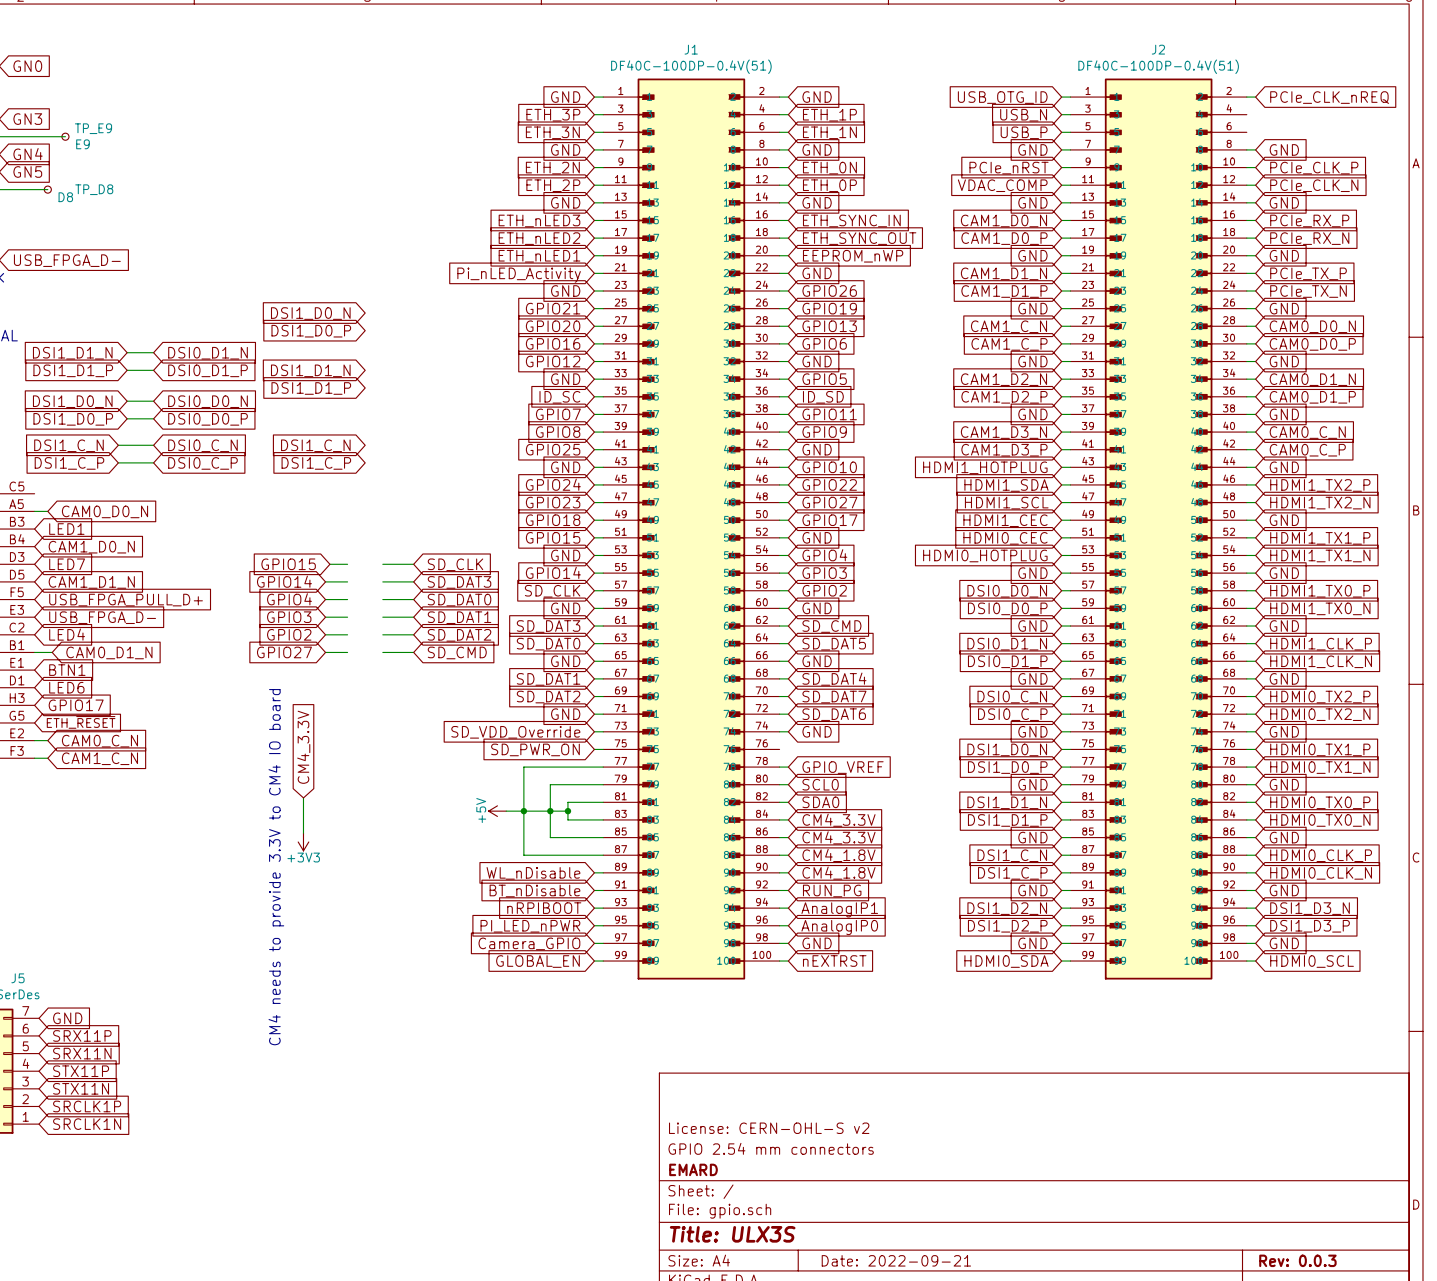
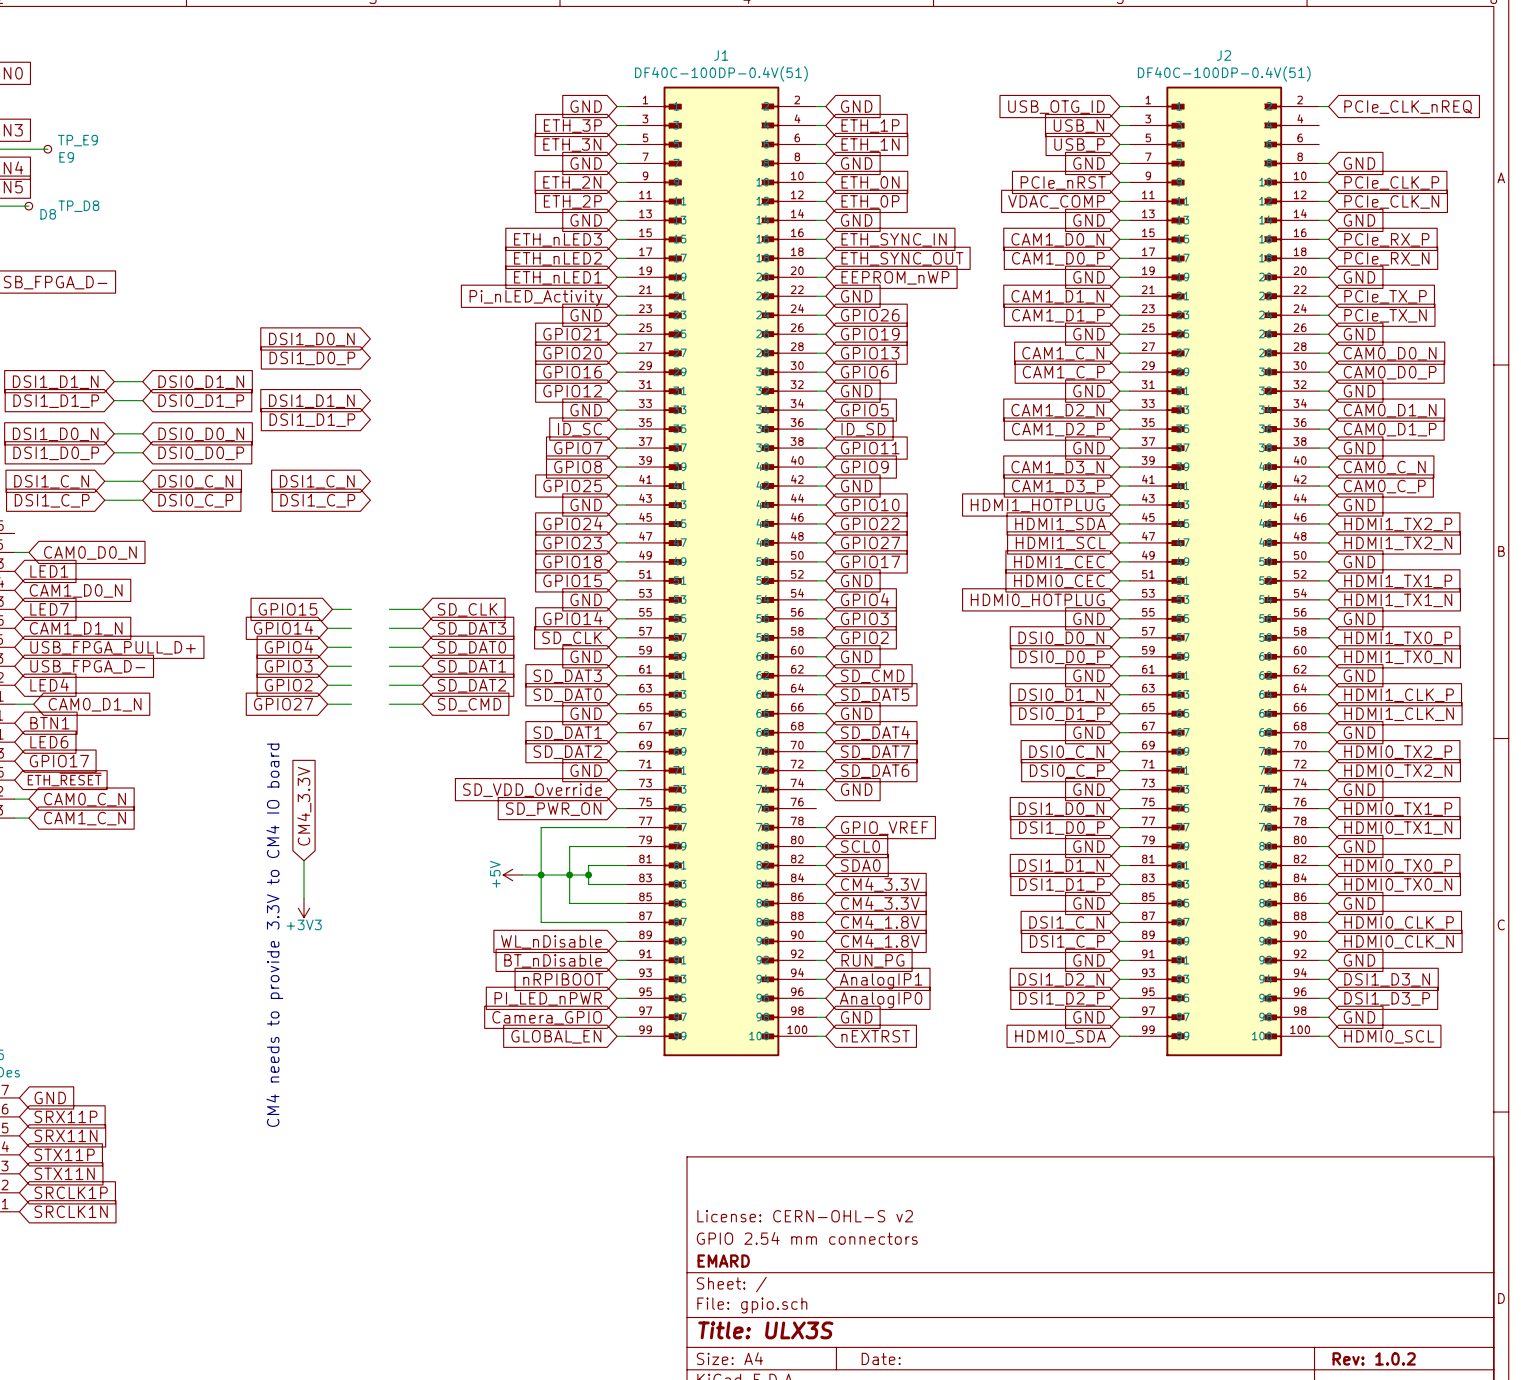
title block: Date: 2022-09-21 (896, 1260) -> Date: (881, 1358)
title block: Rev: 0.0.3 (1297, 1260) -> Rev: 1.0.2 (1374, 1358)

